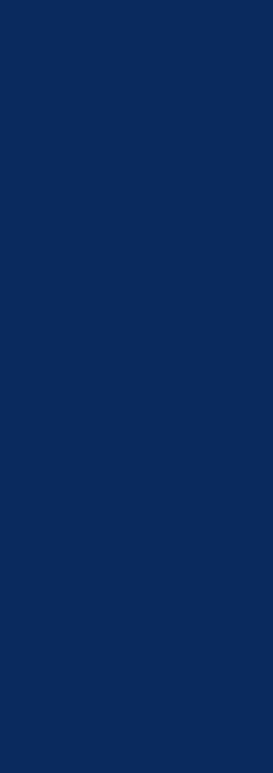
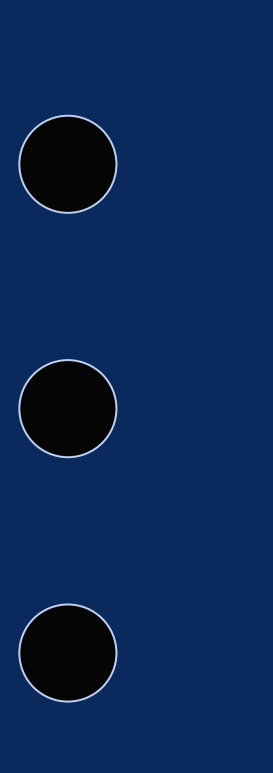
part: none -> (67, 164)
part: none -> (67, 408)
part: none -> (67, 653)

